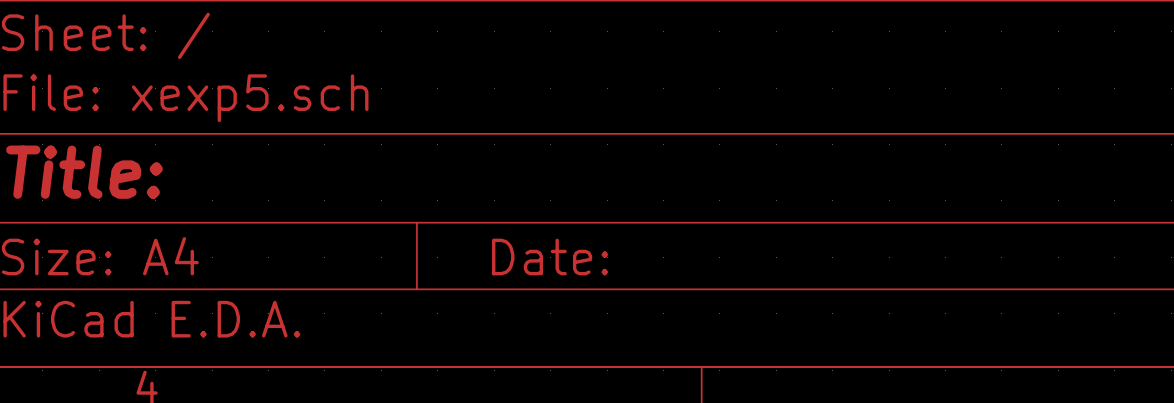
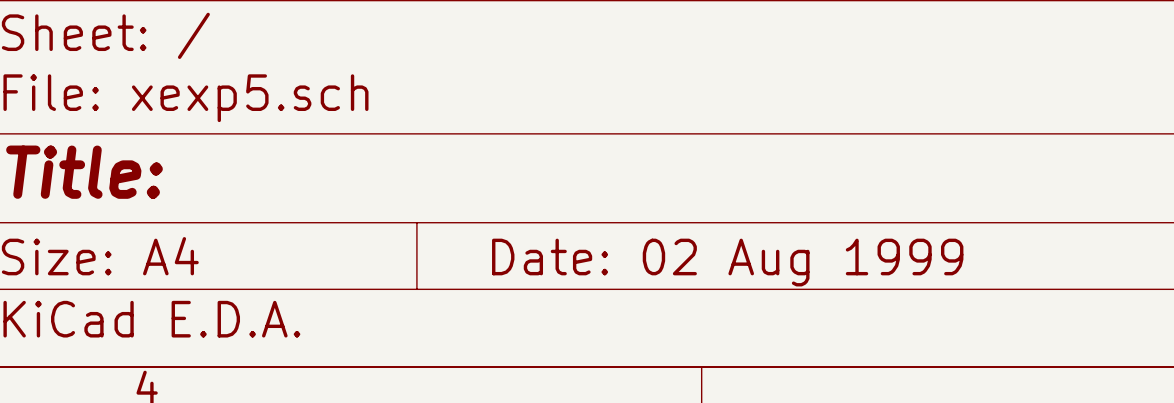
title block: Date: (550, 257) -> Date: 02 Aug 1999 (727, 262)

